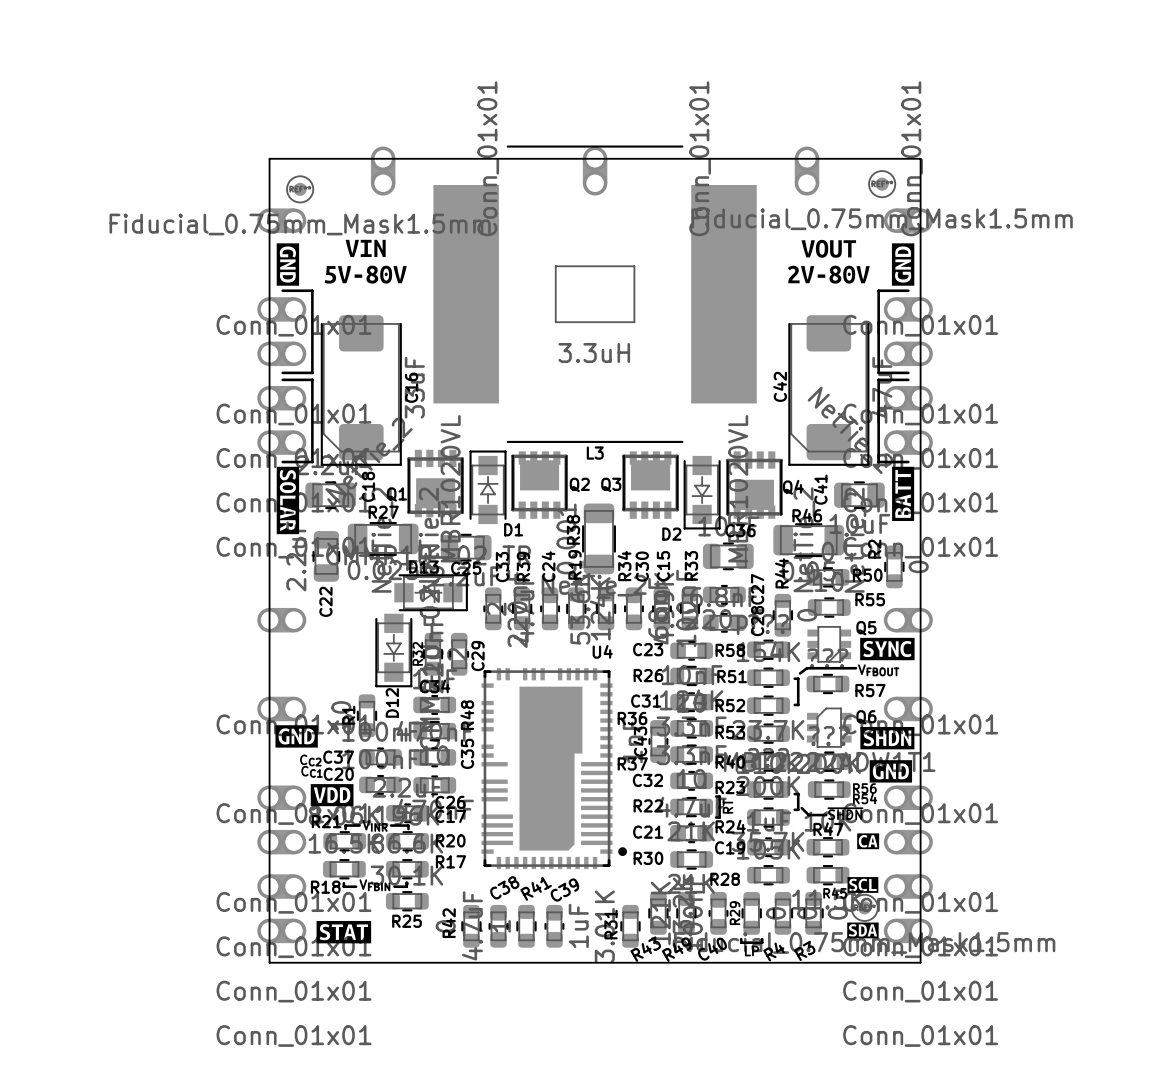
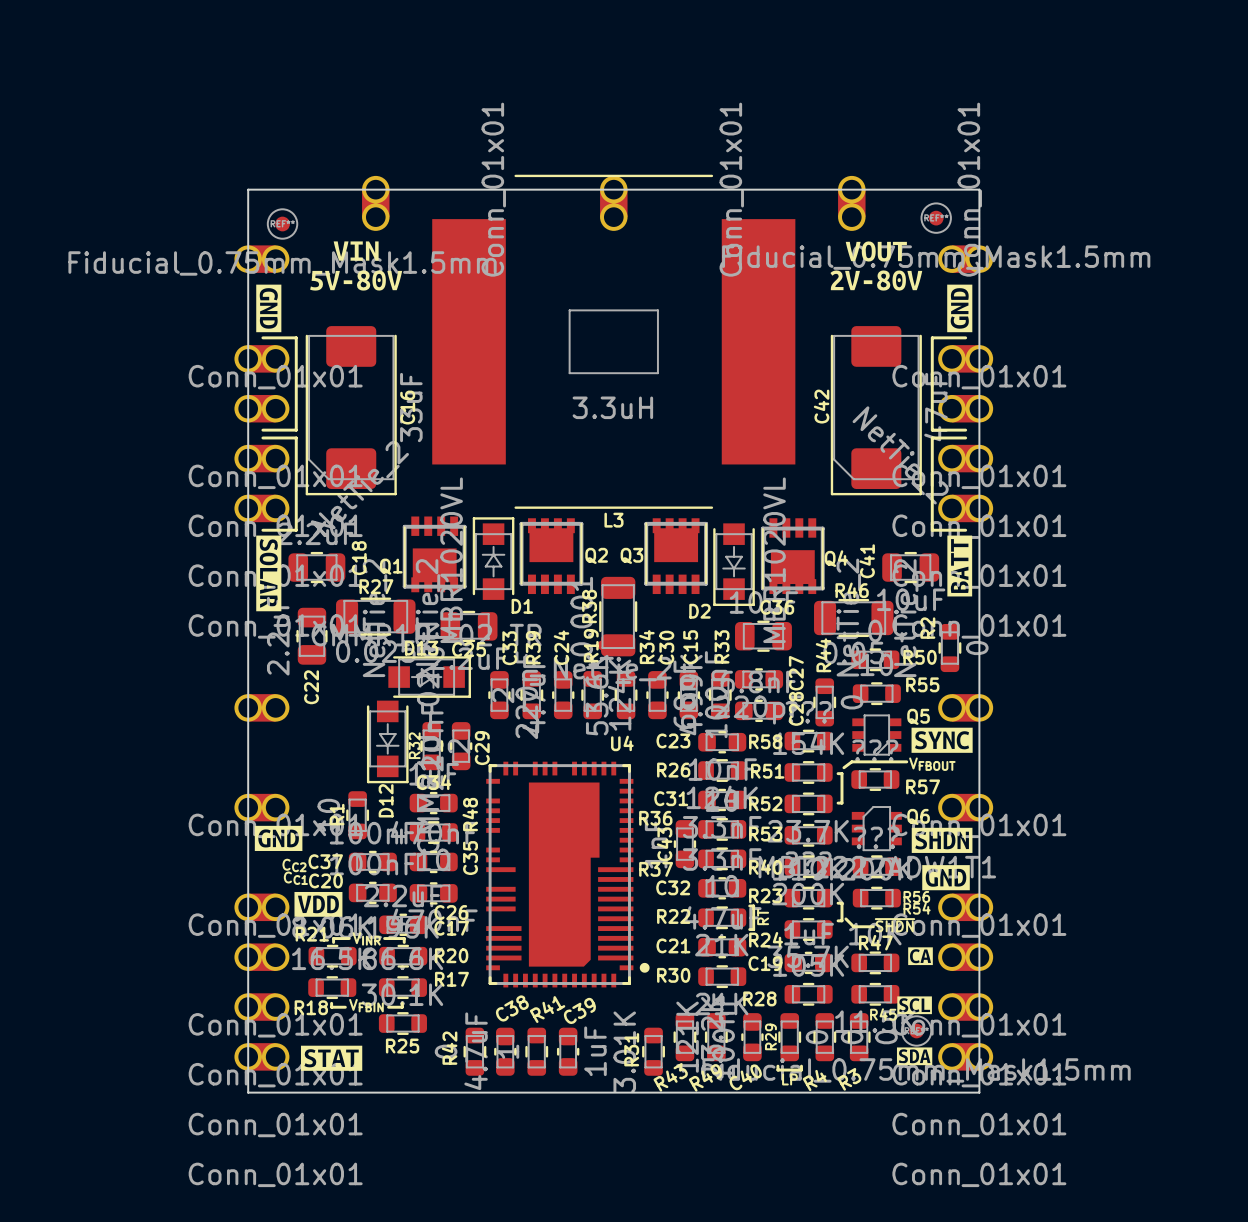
drawing position: (365, 248) -> (356, 251)
drawing position: (828, 248) -> (876, 251)
drawing position: (365, 274) -> (356, 280)
drawing position: (828, 274) -> (876, 280)
C16 position: (361, 390) -> (351, 410)
C42 position: (828, 390) -> (876, 410)
part position: (354, 445) -> (343, 472)
part position: (835, 445) -> (884, 472)

